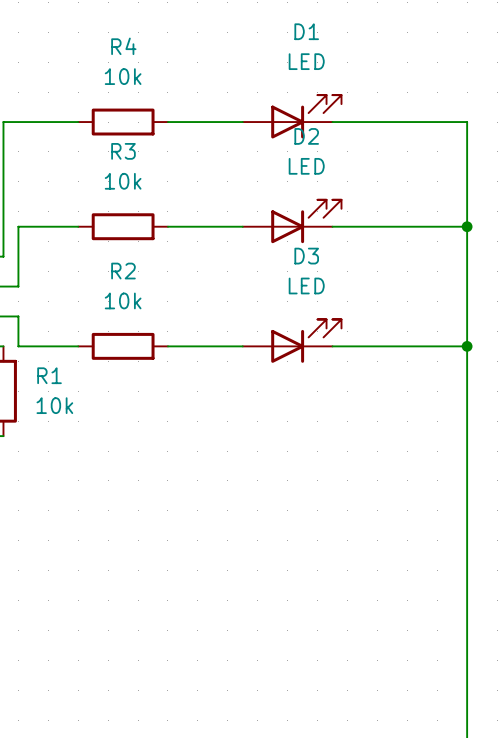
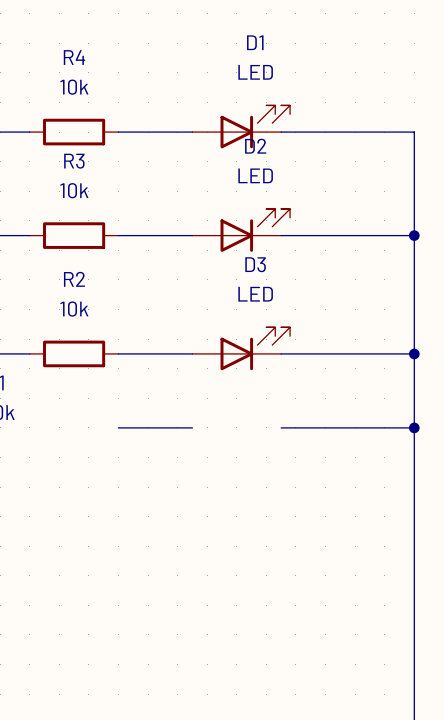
wire: none -> (118, 427) (192, 427)
wire: none -> (281, 427) (414, 427)
junction: none -> (414, 427)

